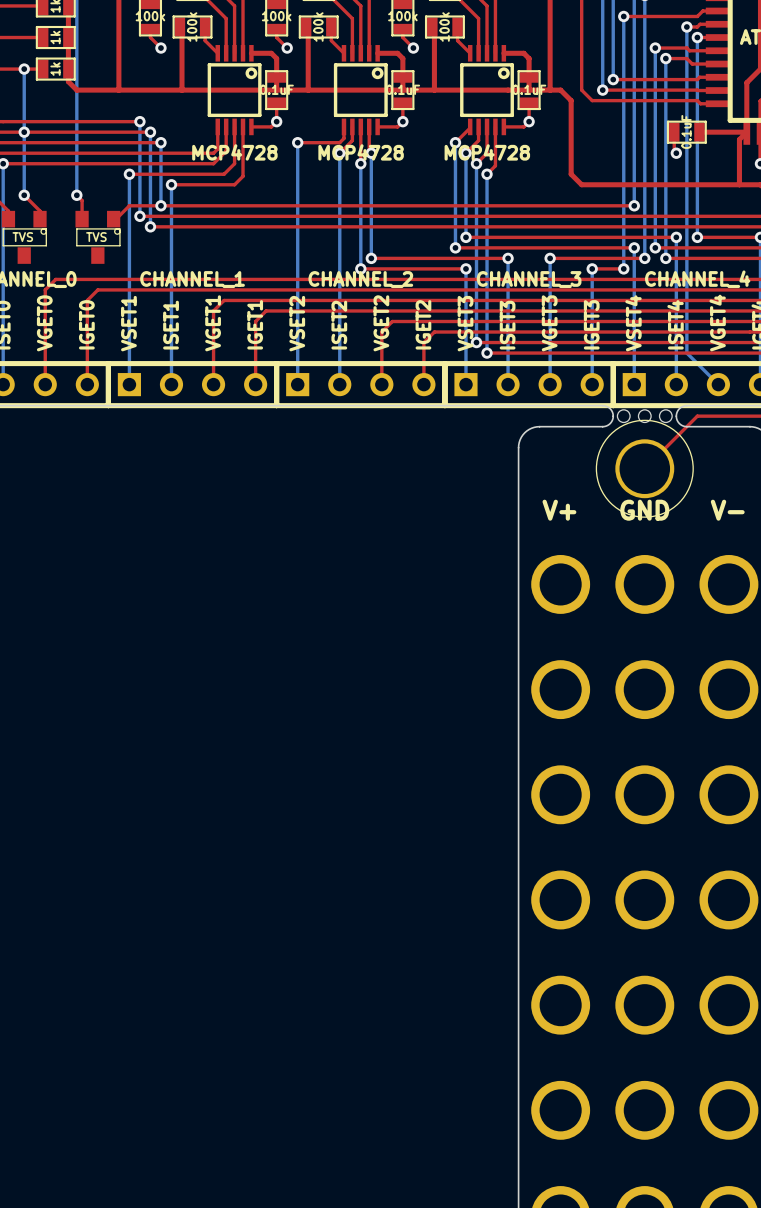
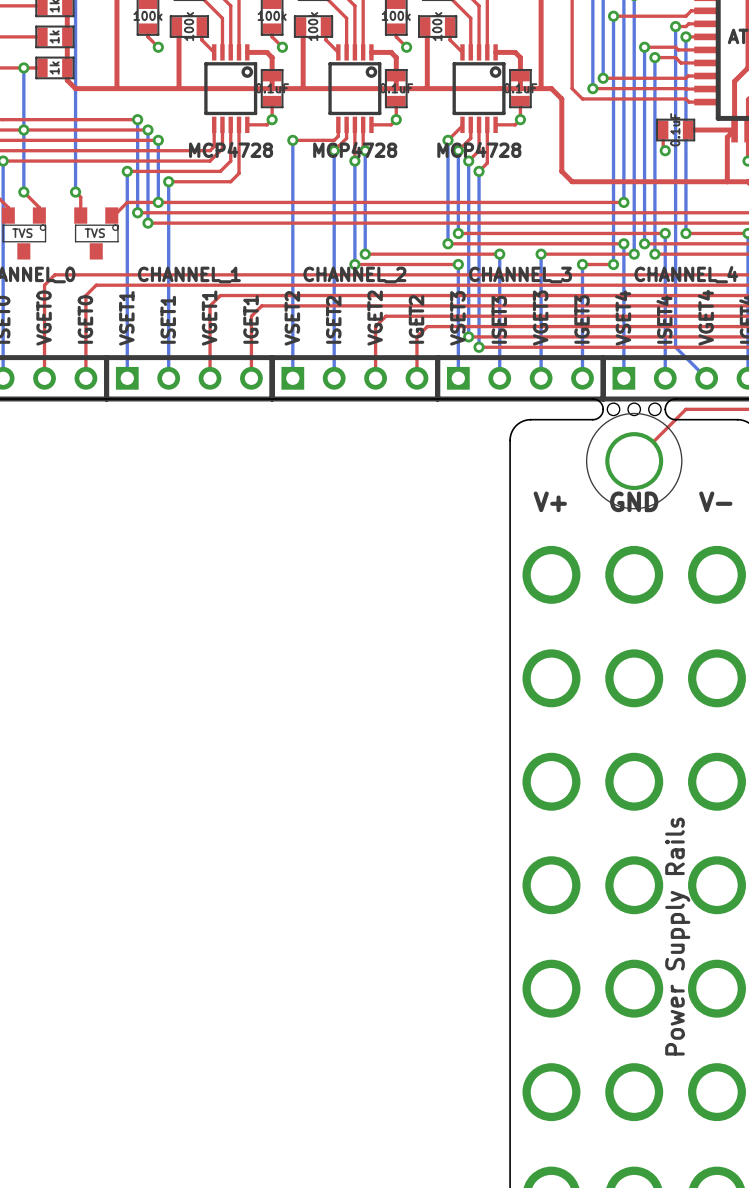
text: none -> Power Supply Rails (677, 936)

